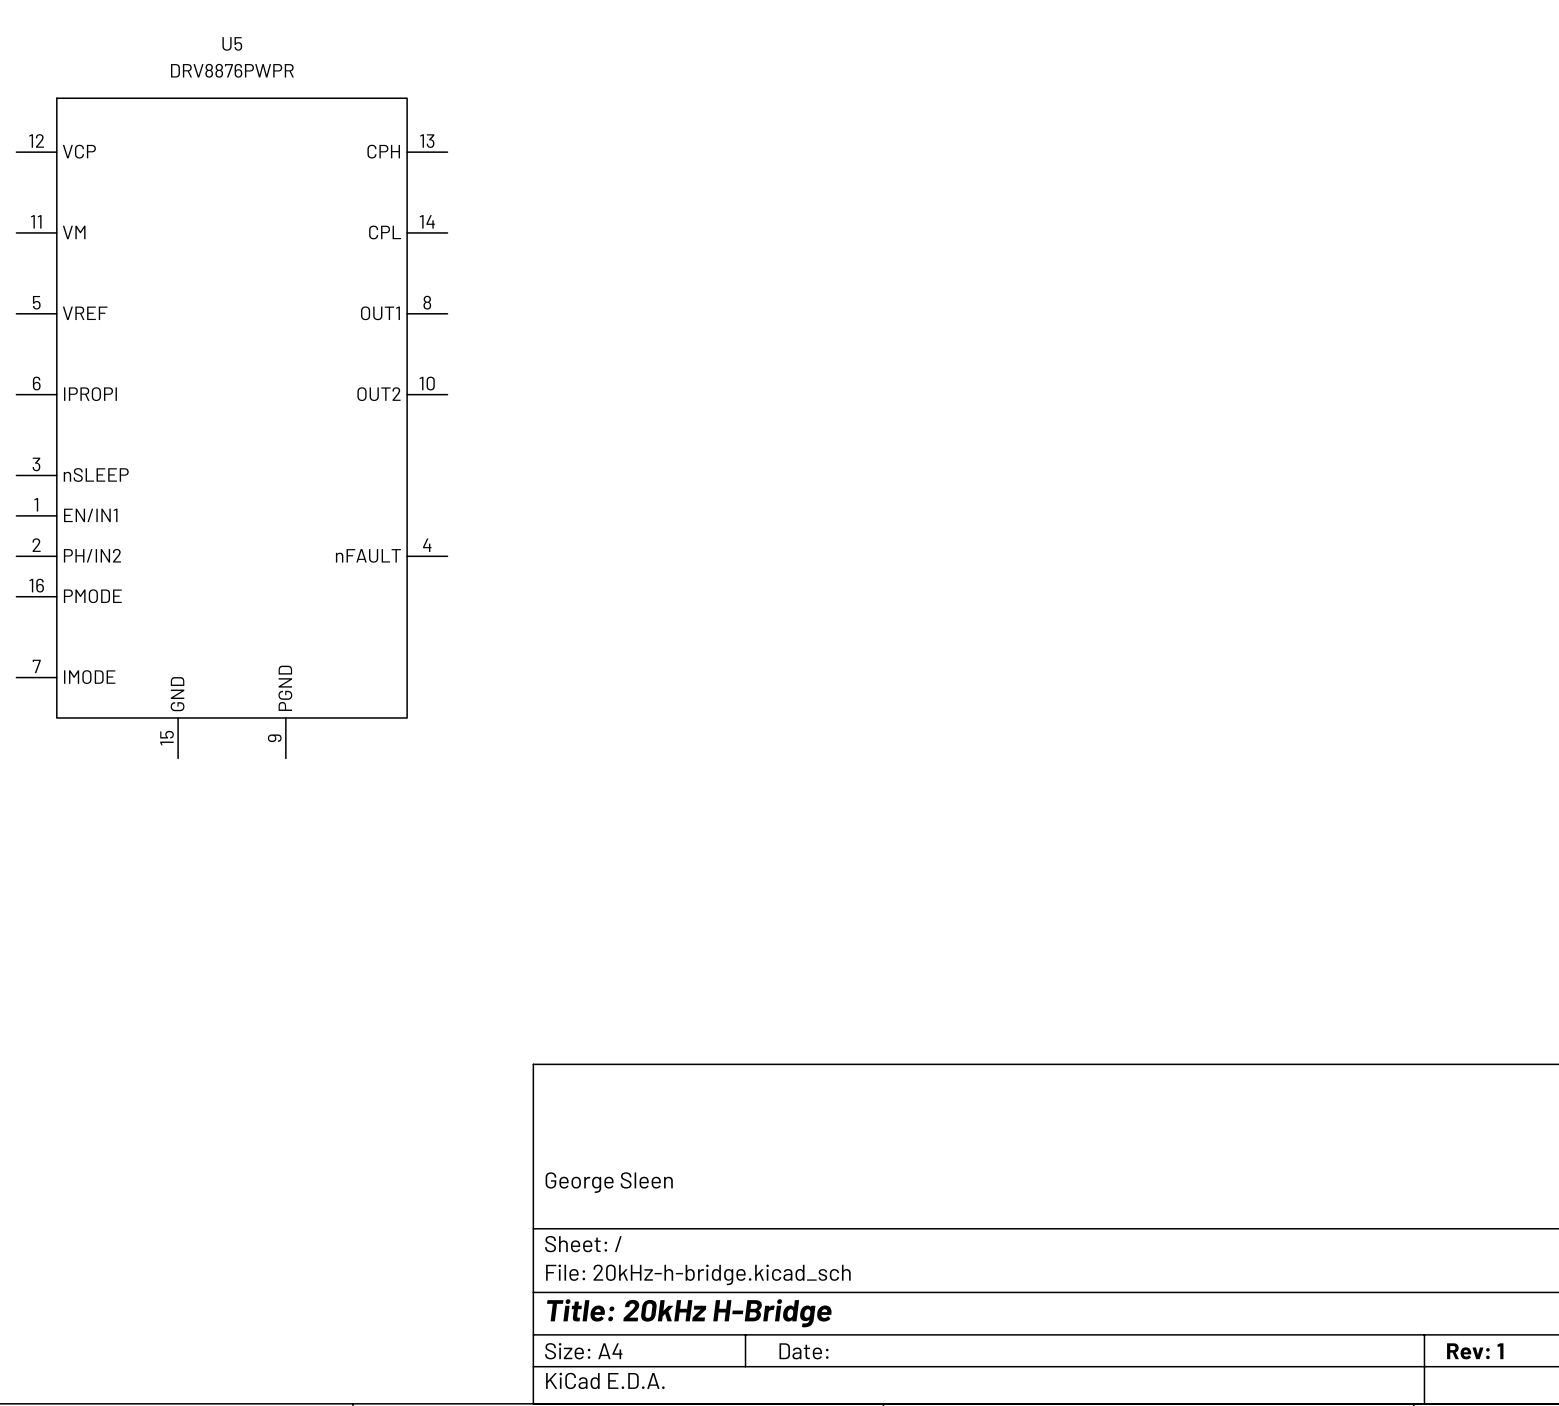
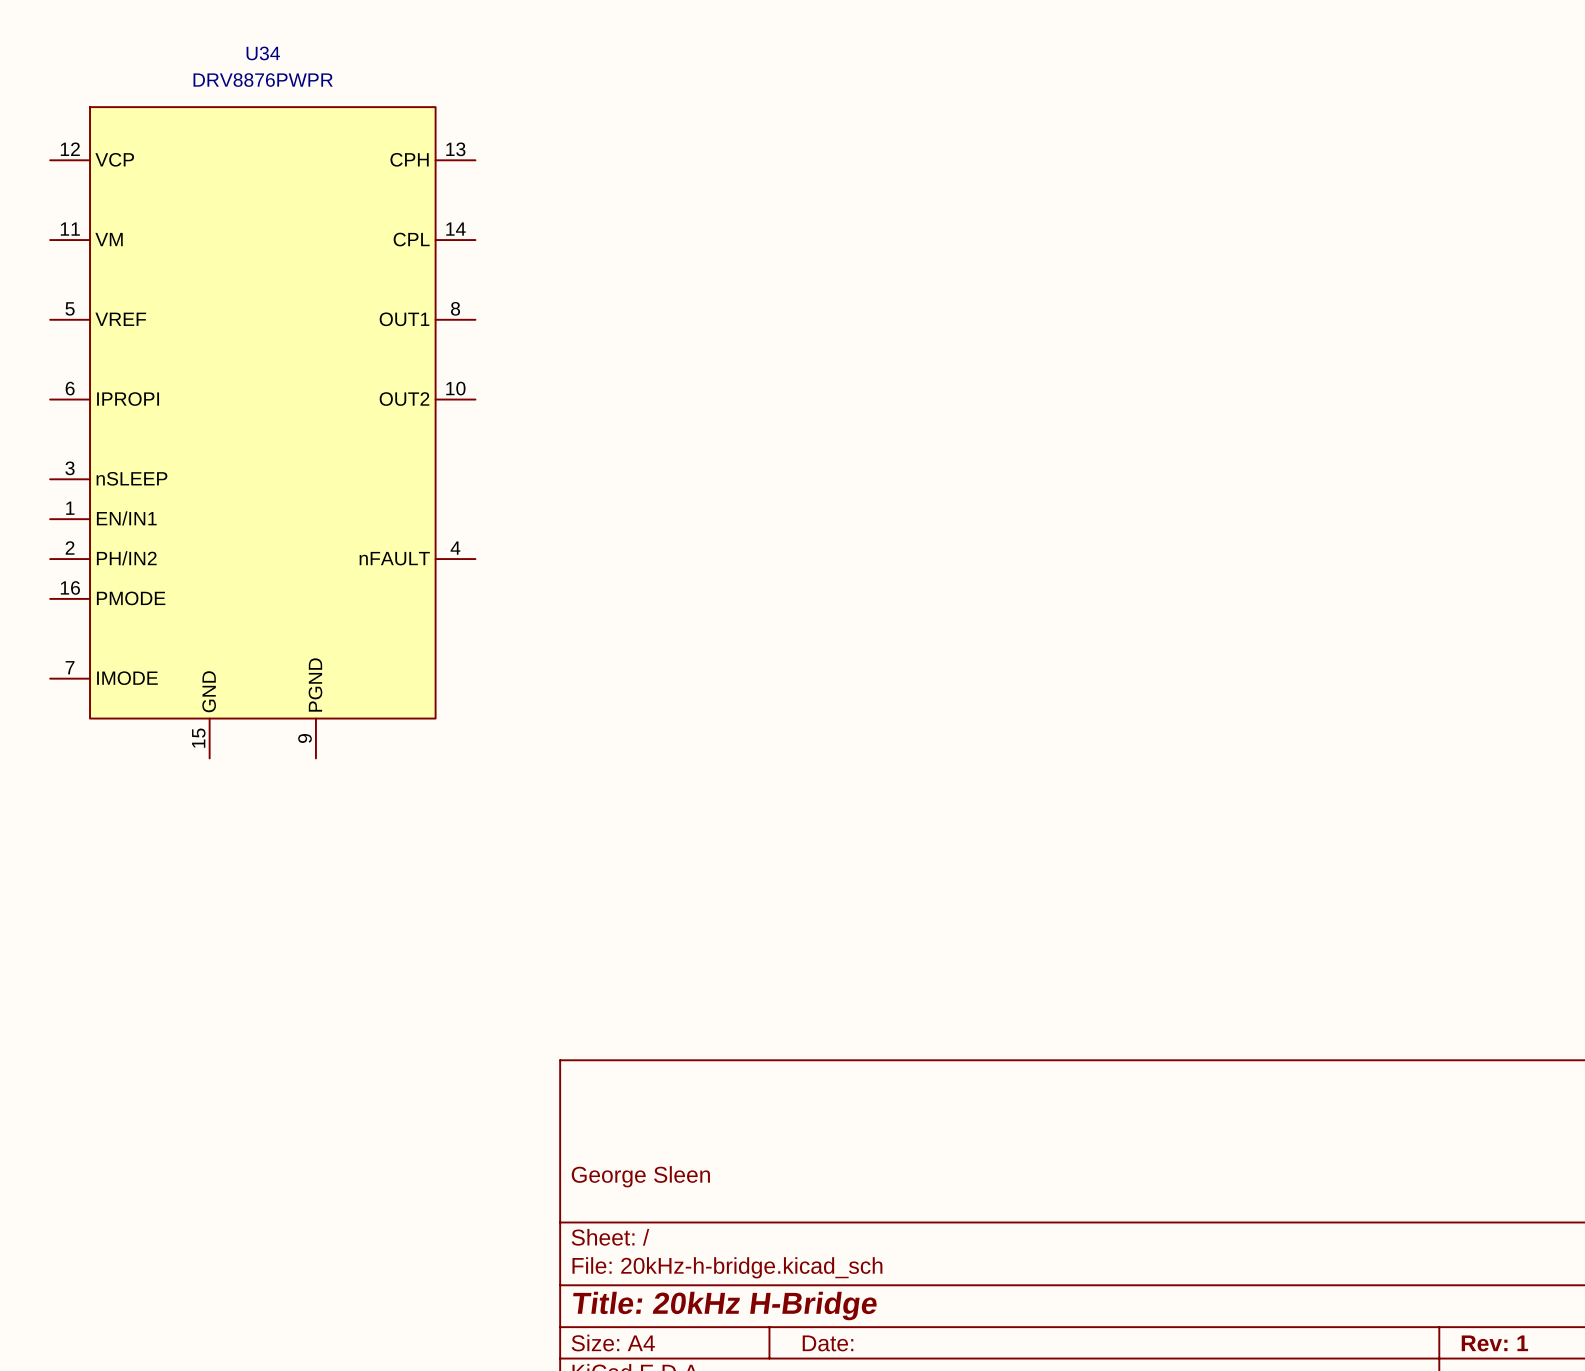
U5 name: U5 (232, 43) -> U34 (263, 53)

